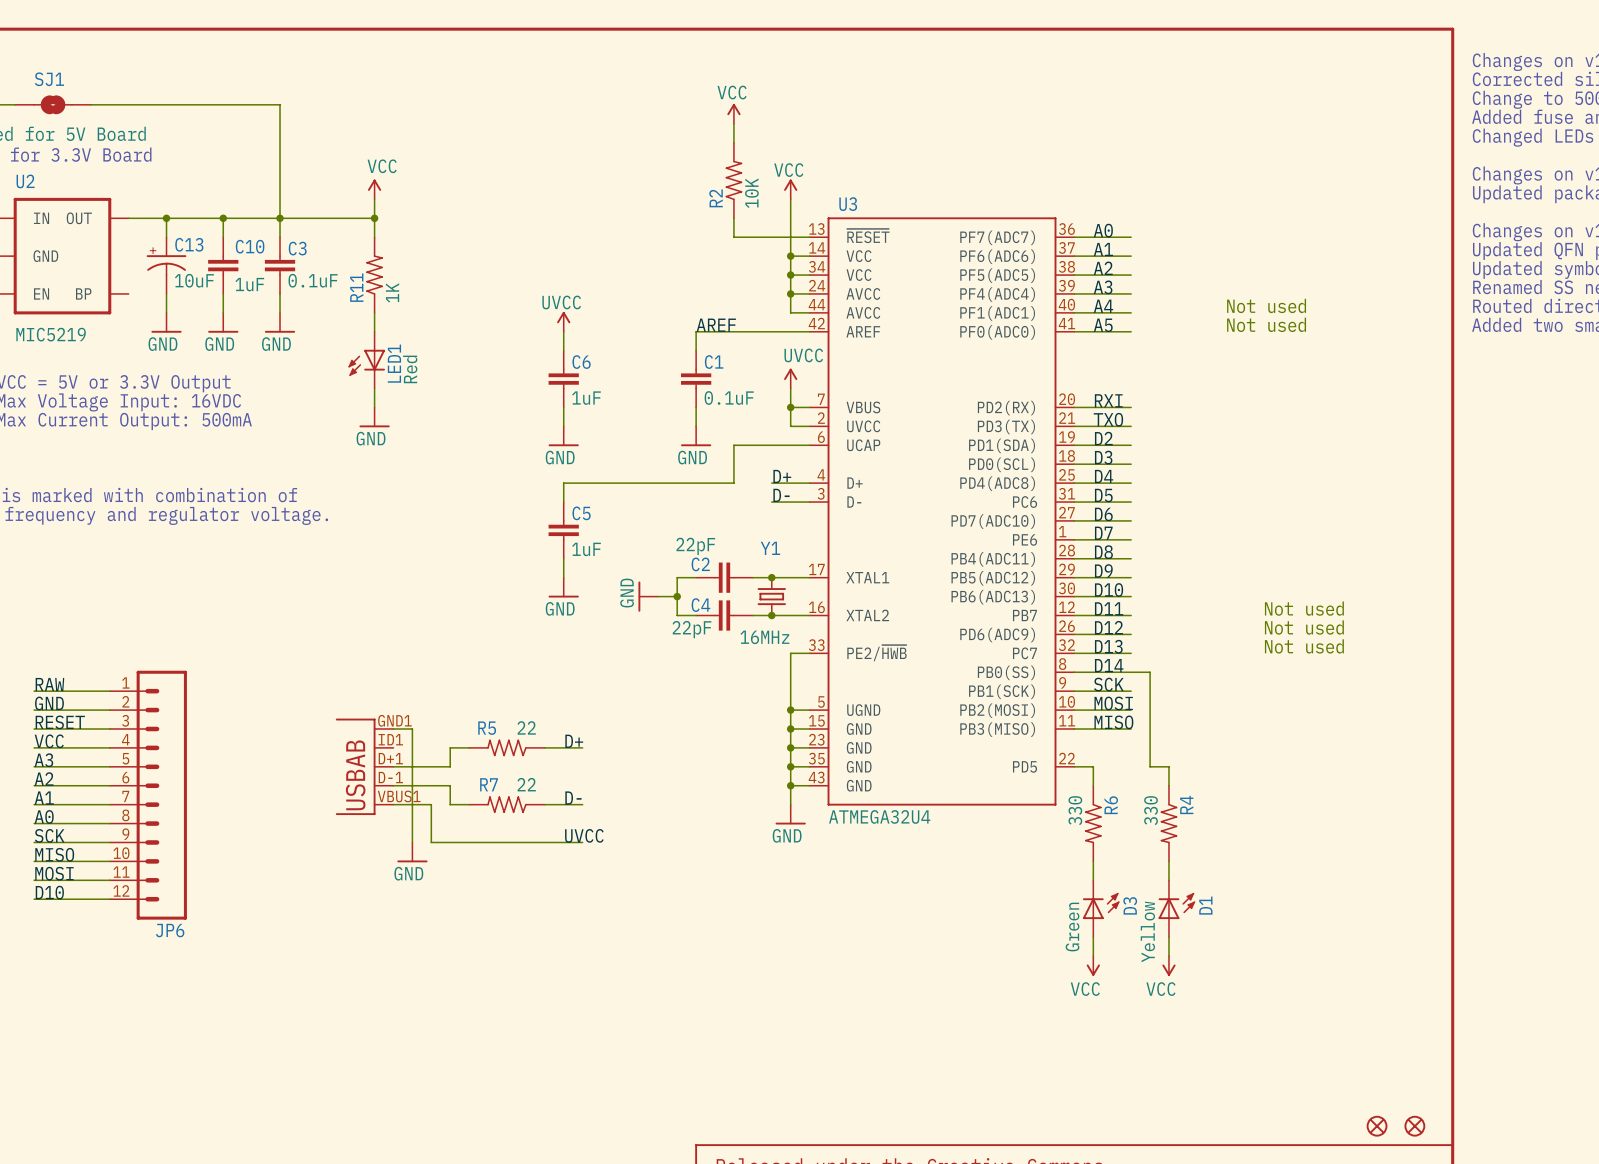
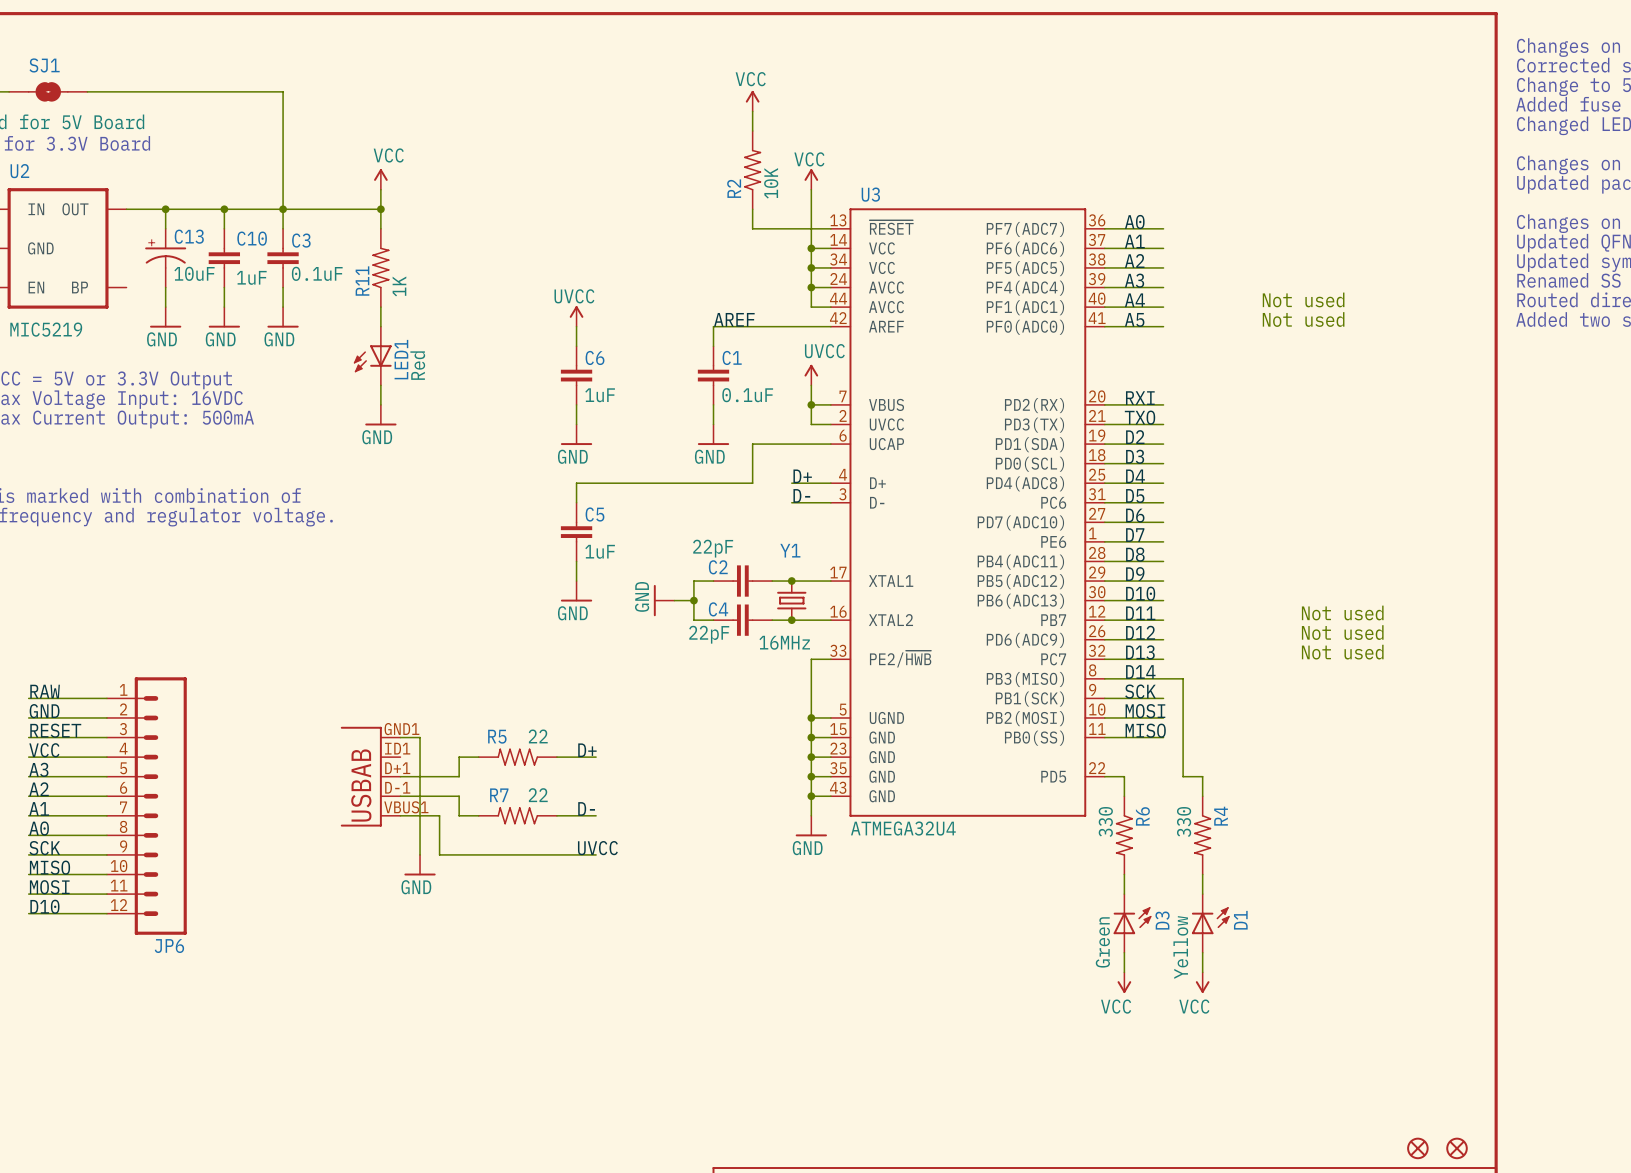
U3 pin name: PB0(SS) (1006, 672) -> PB3(MISO) (1025, 679)
U3 pin name: PB3(MISO) (997, 729) -> PB0(SS) (1034, 738)

